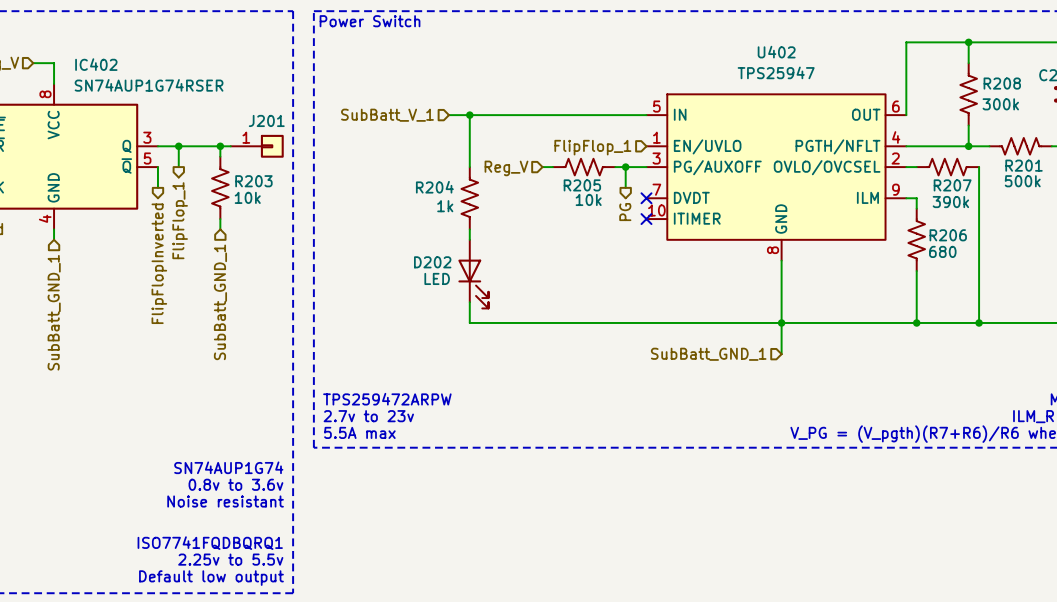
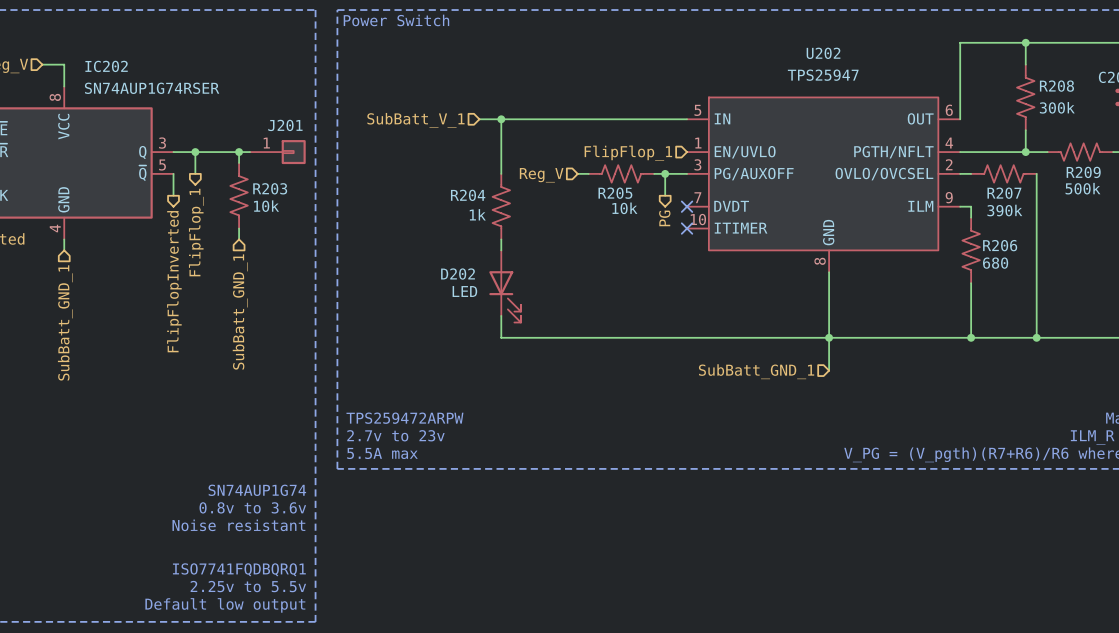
U402 name: U402 (776, 52) -> U202 (823, 53)
IC402 name: IC402 (96, 64) -> IC202 (106, 66)
R201 name: R201 (1024, 165) -> R209 (1083, 172)

